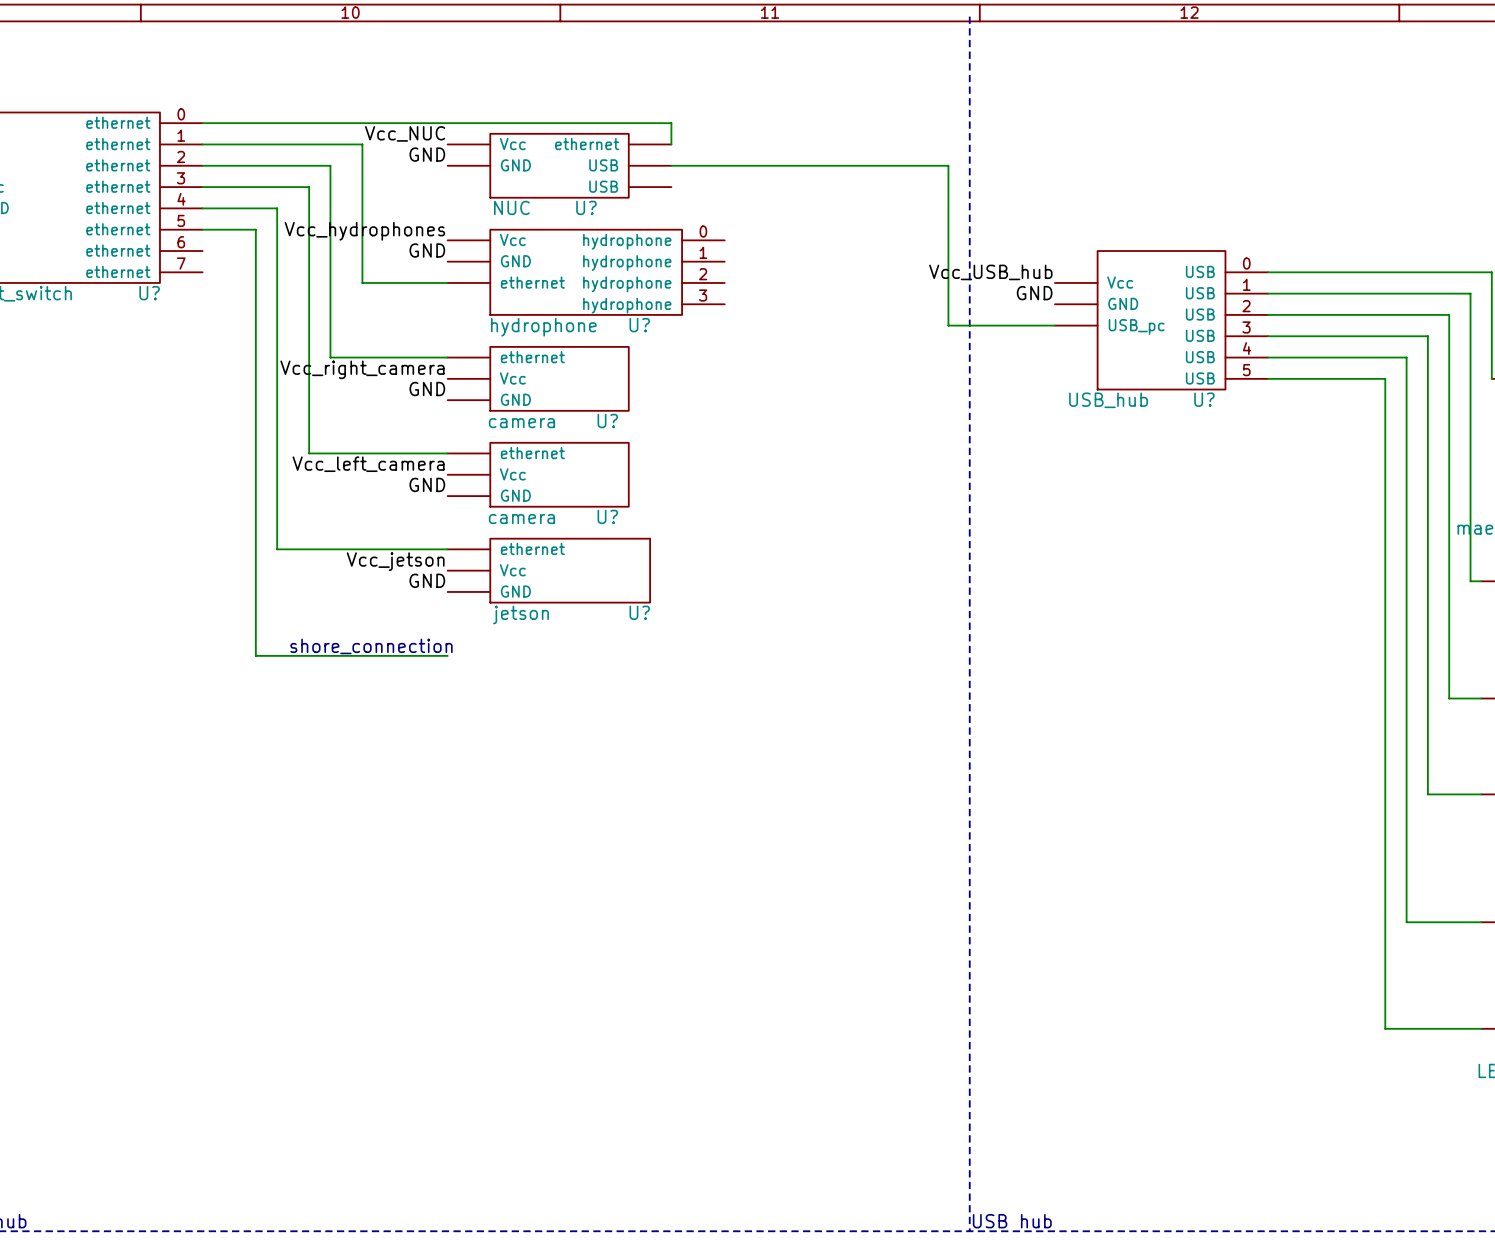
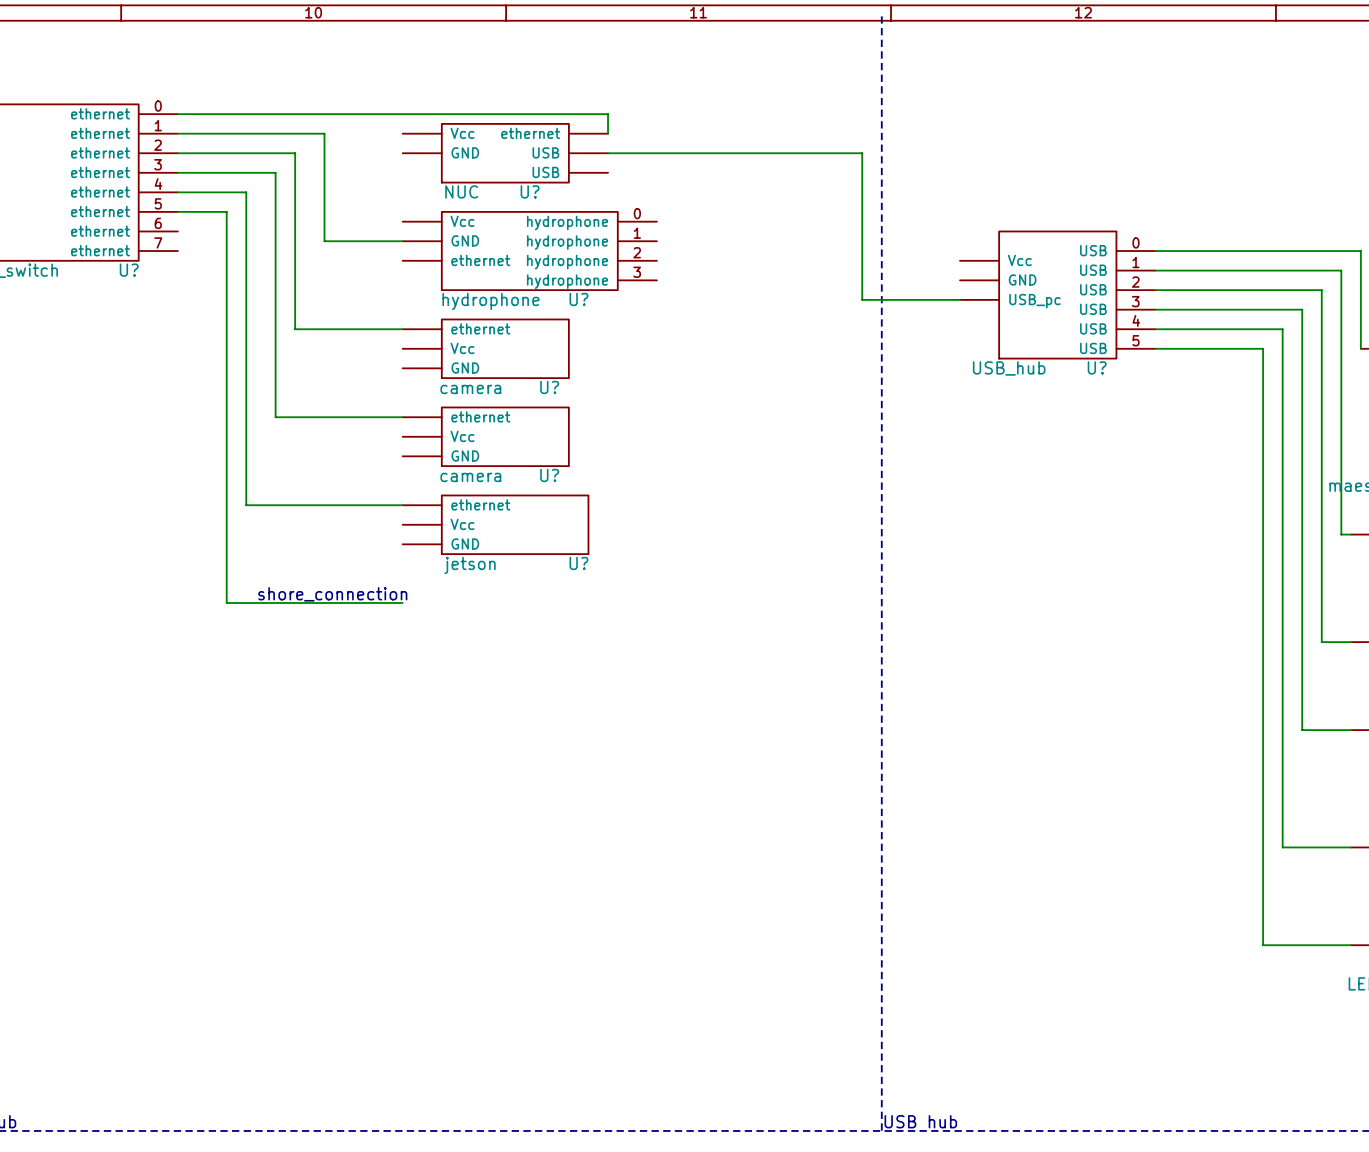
label: Vcc_NUC (405, 133) -> none
label: GND (427, 154) -> none
label: Vcc_hydrophones (364, 231) -> none
label: GND (427, 250) -> none
wire: (362, 261) (362, 282) (447, 282) -> (324, 241) (402, 241)
label: Vcc_USB_hub (990, 272) -> none
label: GND (1034, 293) -> none
label: Vcc_right_camera (362, 369) -> none
label: GND (427, 389) -> none
label: Vcc_left_camera (368, 464) -> none
label: GND (427, 484) -> none
label: Vcc_jetson (395, 561) -> none
label: GND (427, 580) -> none

